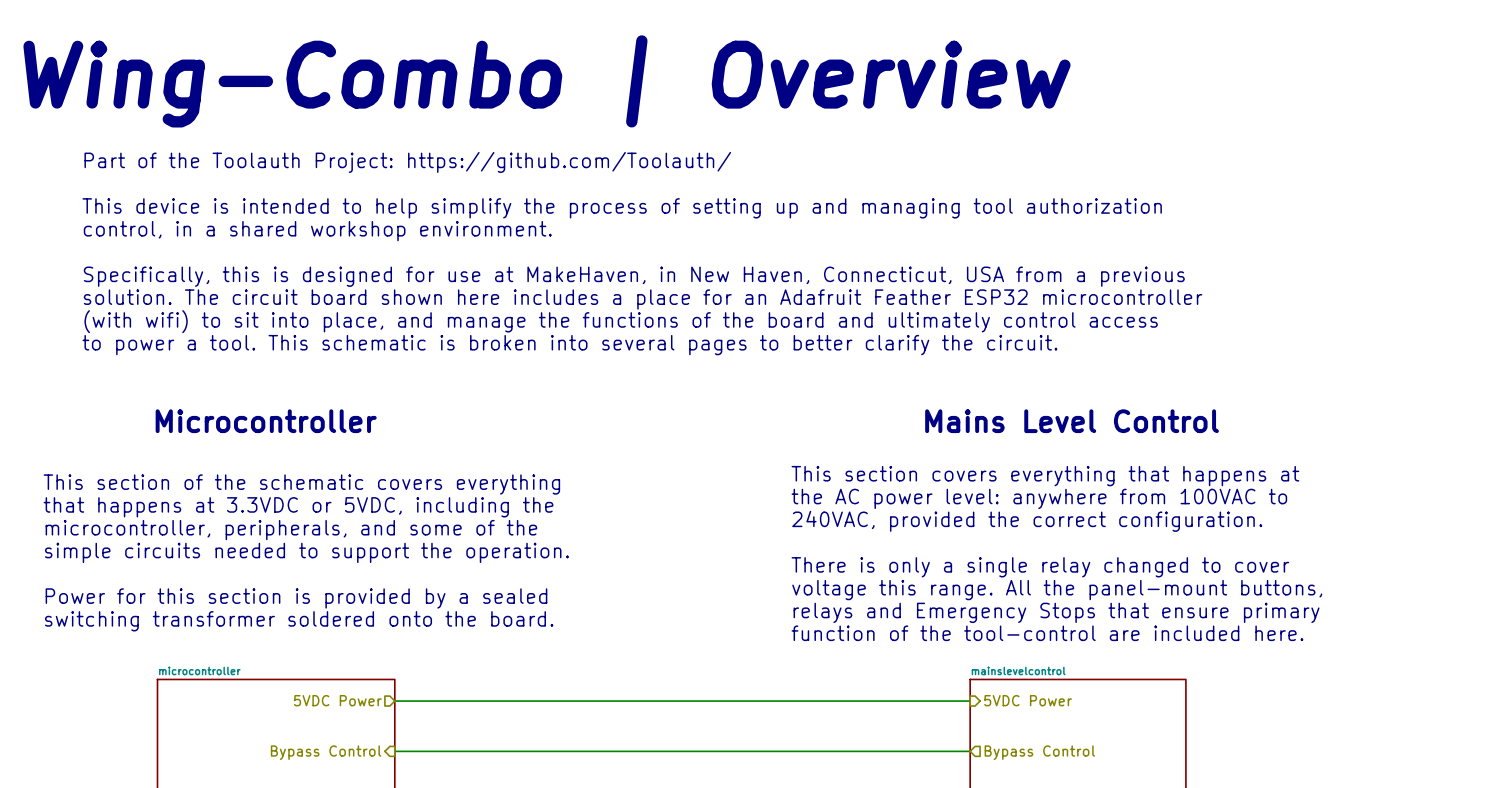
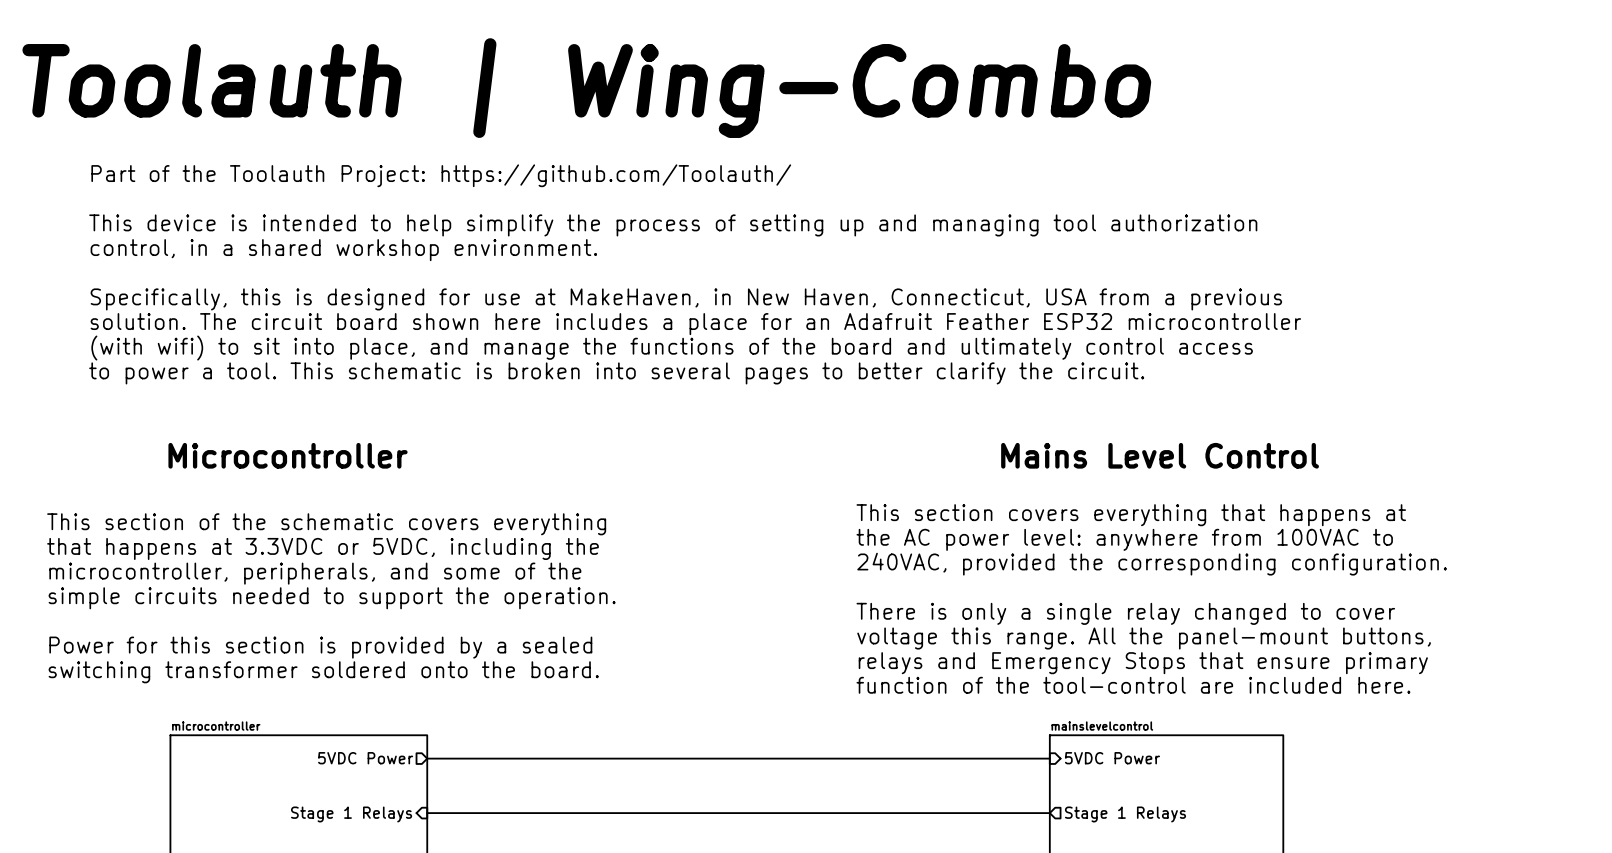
text: Wing-Combo | Overview (546, 81) -> Toolauth | Wing-Combo (586, 88)
text: 240VAC, provided the correct configuration. (1027, 521) -> 240VAC, provided the corresponding configuration. (1152, 564)
hierarchical label: Bypass Control (326, 752) -> Stage 1 Relays (351, 814)
hierarchical label: Bypass Control (1039, 752) -> Stage 1 Relays (1125, 814)

